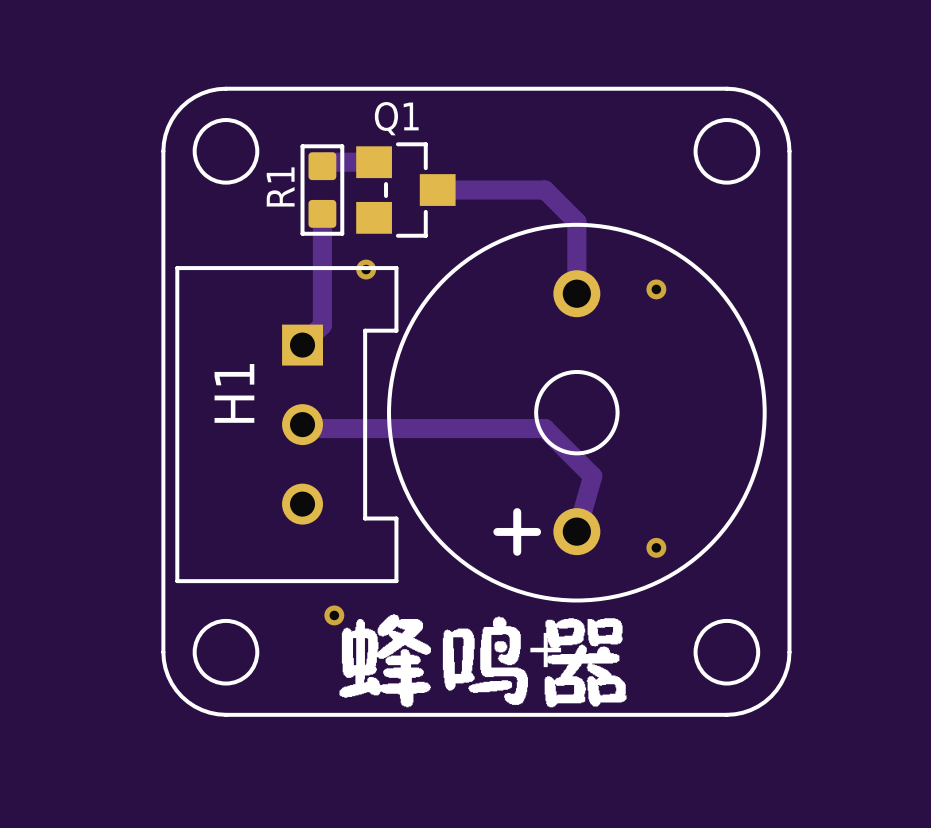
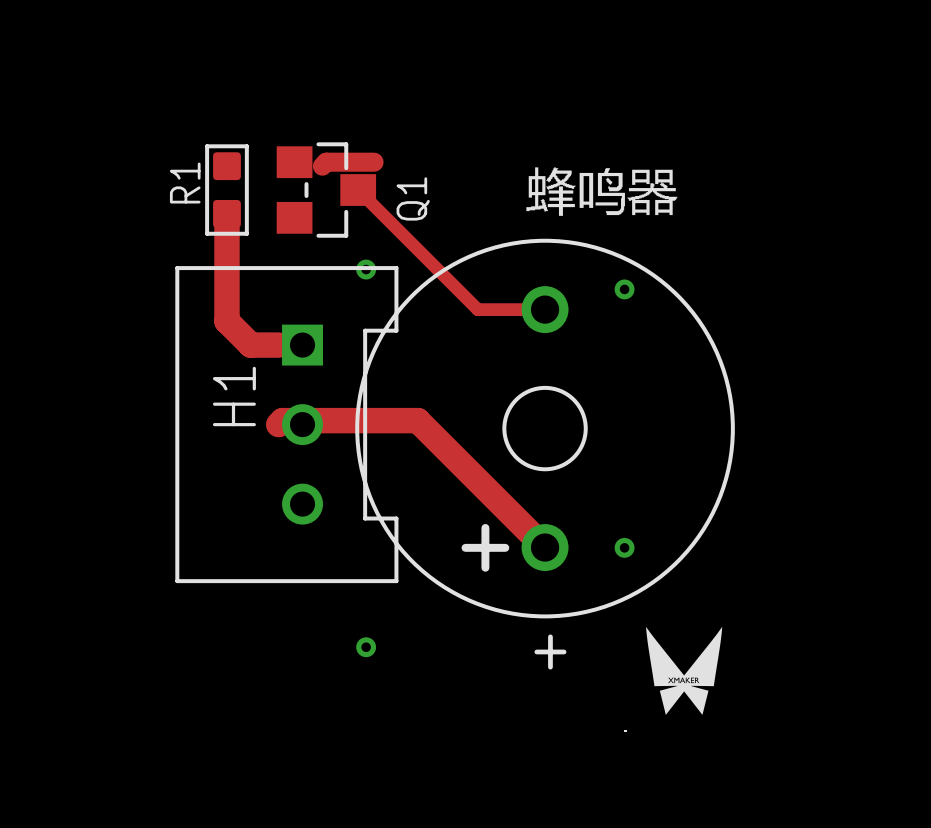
drawing: [161, 86, 792, 717] -> none
Q1 name rotation: 0° (396, 118) -> 90° counterclockwise (413, 198)
Q1 name position: Q1 (396, 118) -> Q1 (413, 198)
drawing: none -> [526, 167, 678, 216]
R1 position: (322, 190) -> (226, 190)
track: none -> (358, 190) (477, 309) (545, 309)
Q1 position: (405, 190) -> (326, 190)
track: (437, 190) (545, 190) (576, 221) (576, 293) -> none
track: none -> (226, 213) (226, 321) (250, 345) (278, 345)
track: (322, 213) (322, 325) (302, 345) -> none
via position: (656, 289) -> (624, 289)
part position: (576, 412) -> (545, 428)
track: none -> (278, 424) (282, 420) (417, 420) (544, 547)
track: (302, 424) (306, 428) (545, 428) (592, 476) (576, 531) -> none
via position: (656, 547) -> (624, 547)
via position: (334, 615) -> (366, 647)
drawing: none -> [646, 616, 723, 715]

